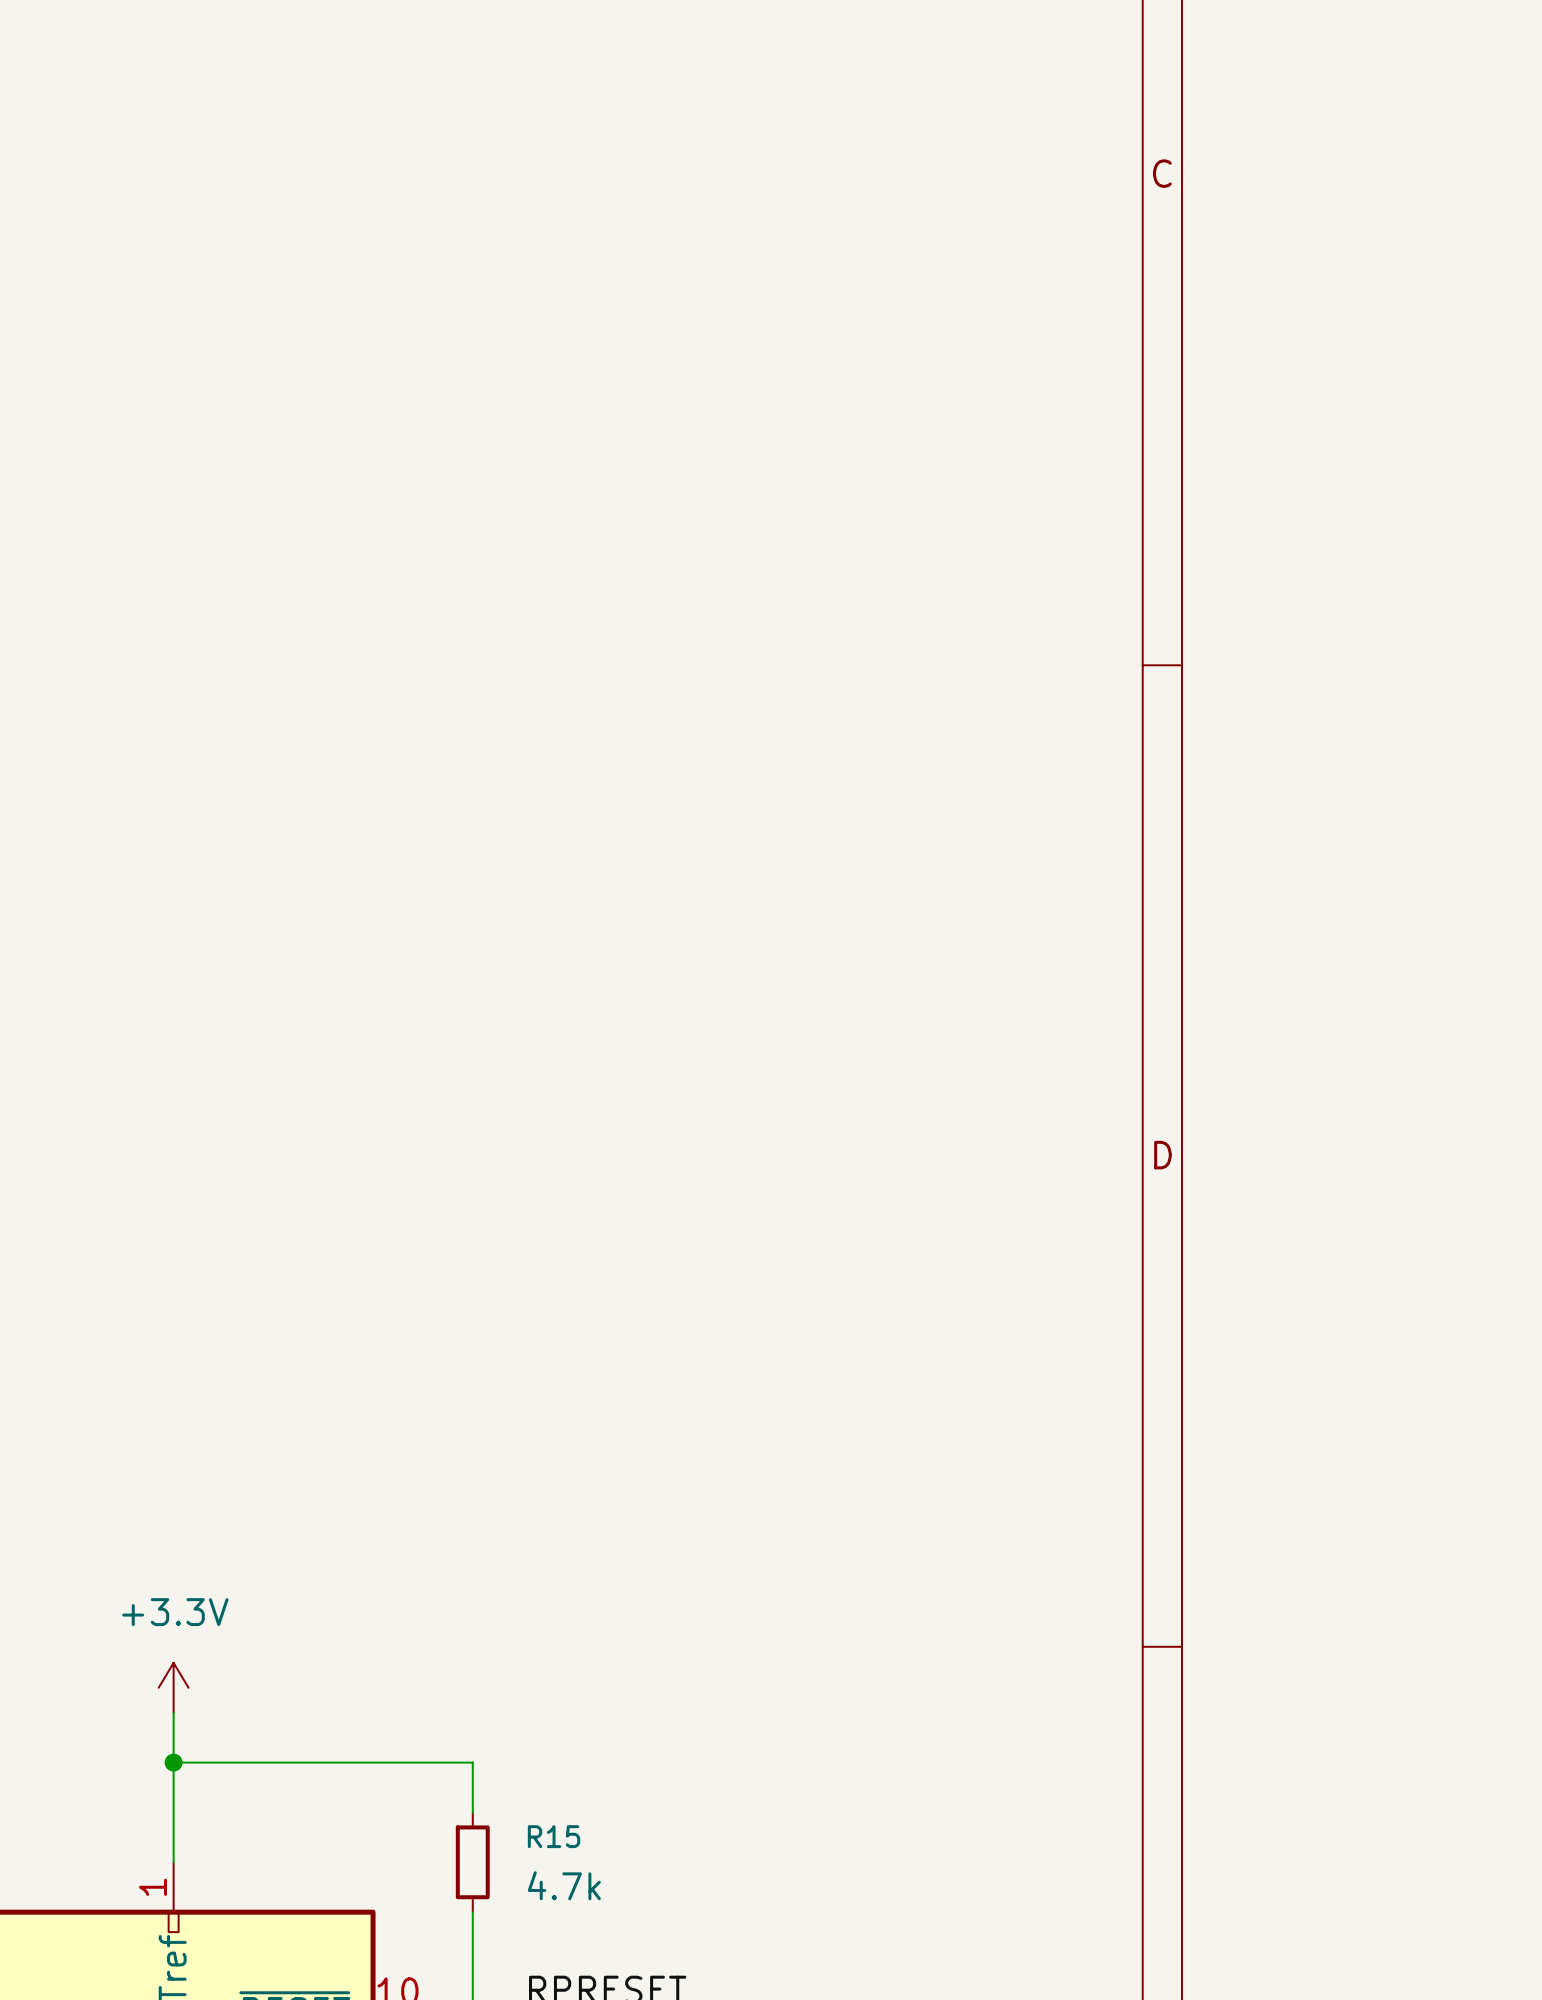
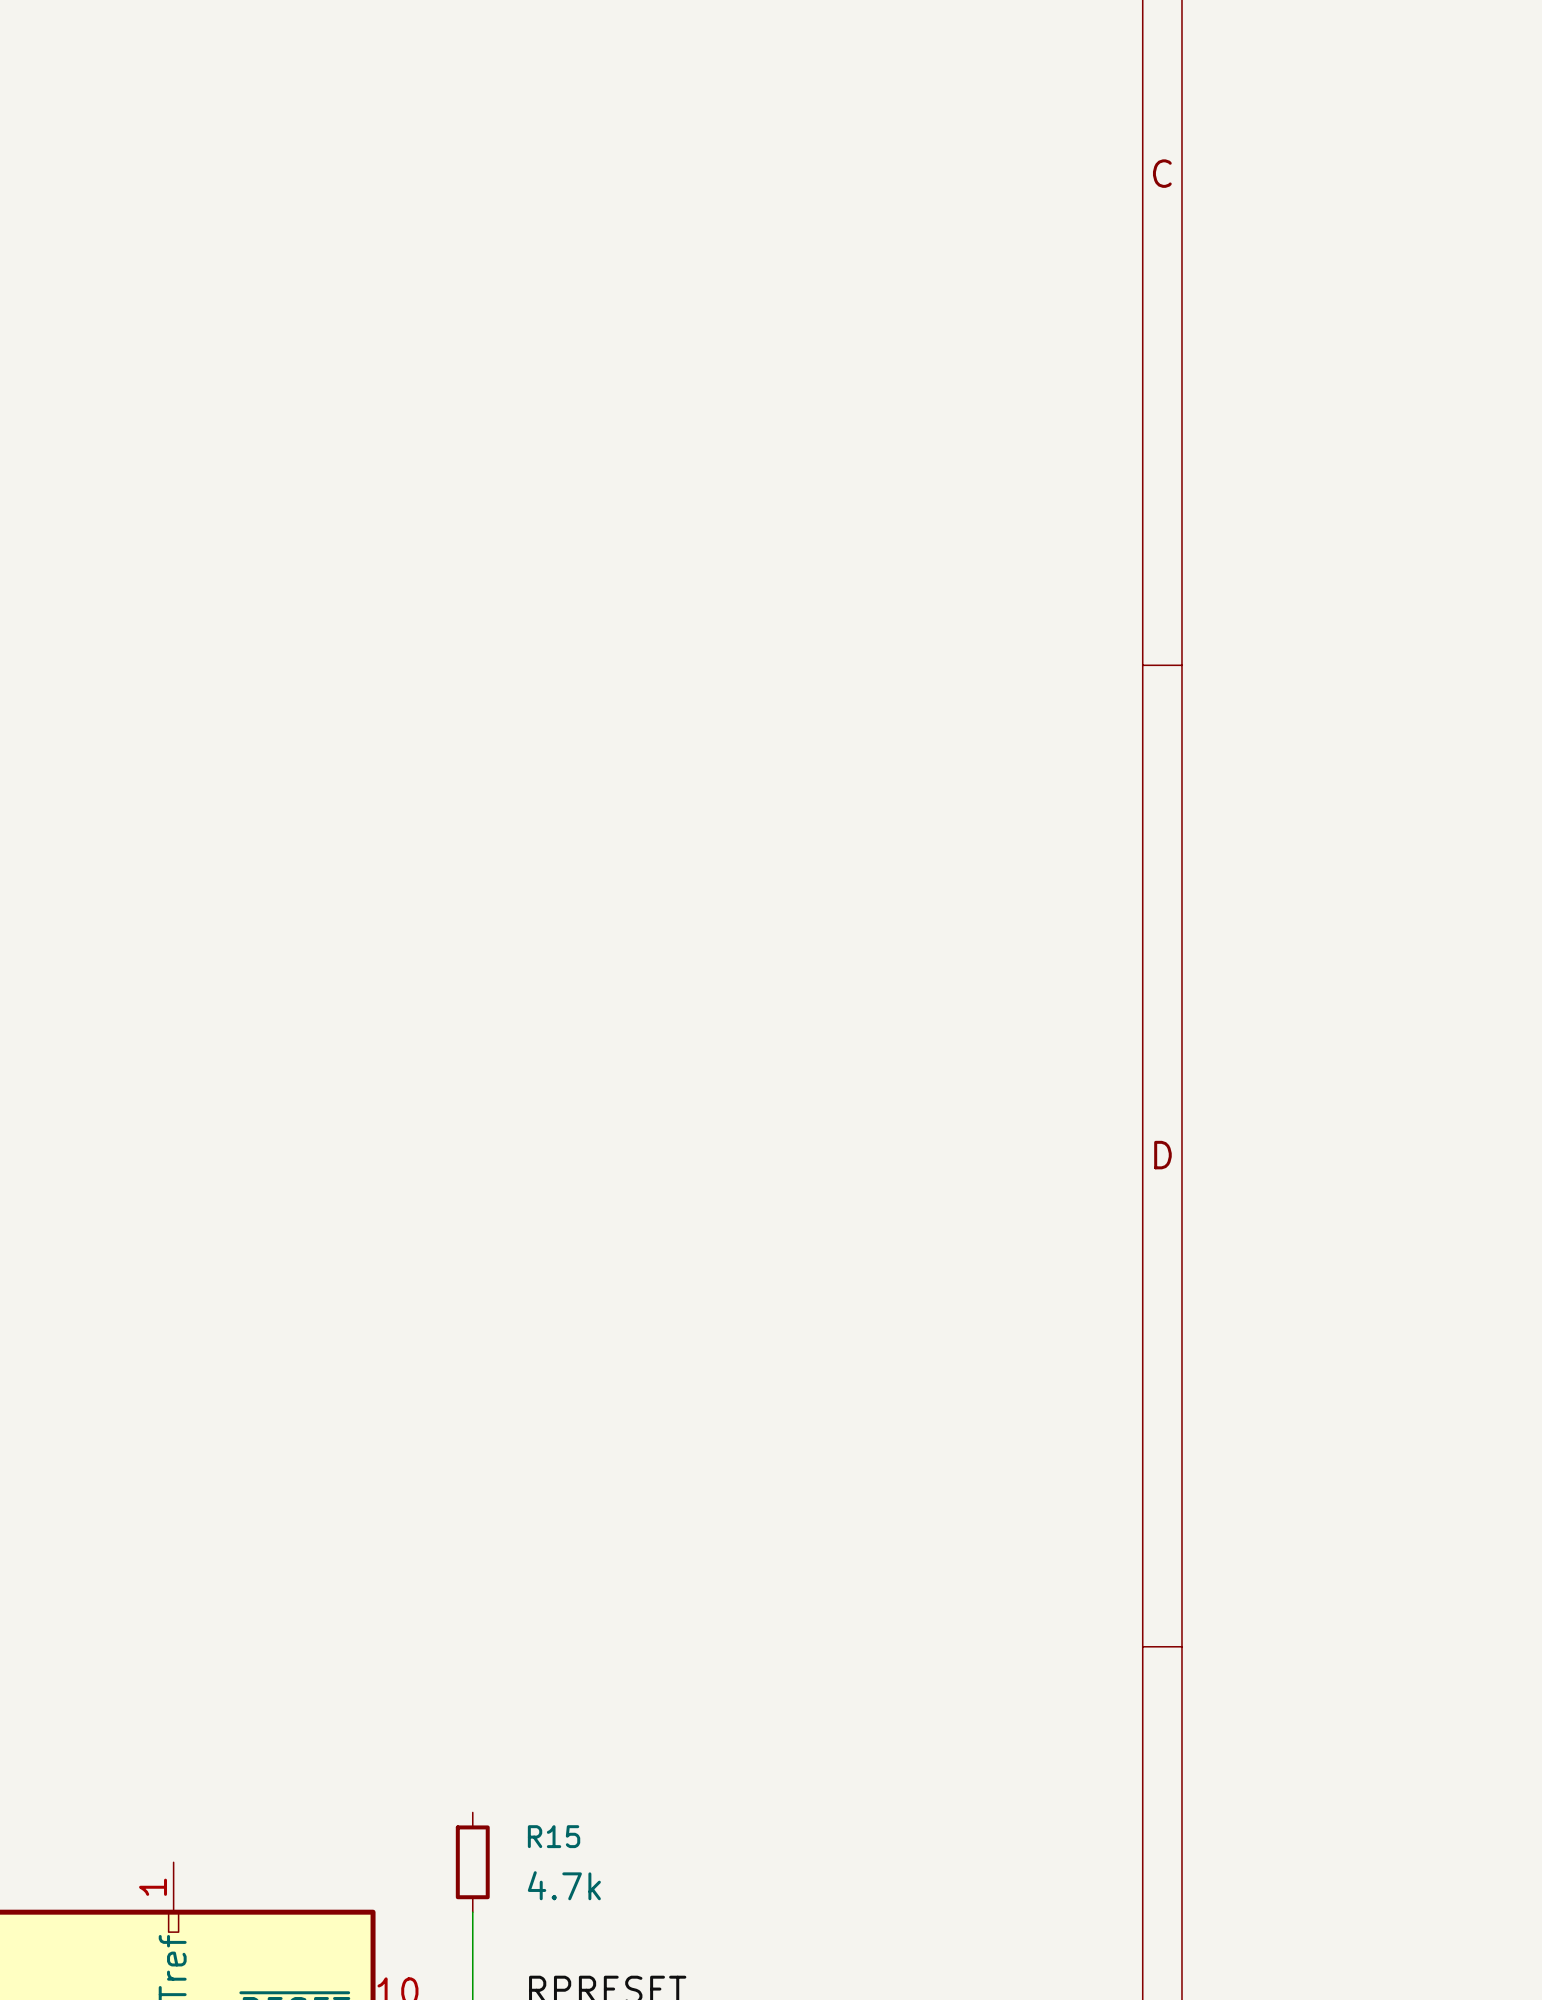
power symbol: +3.3V (173, 1687) -> none
wire: (173, 1712) (173, 1862) -> none
wire: (173, 1762) (472, 1762) (472, 1812) -> none
junction: (173, 1762) -> none

